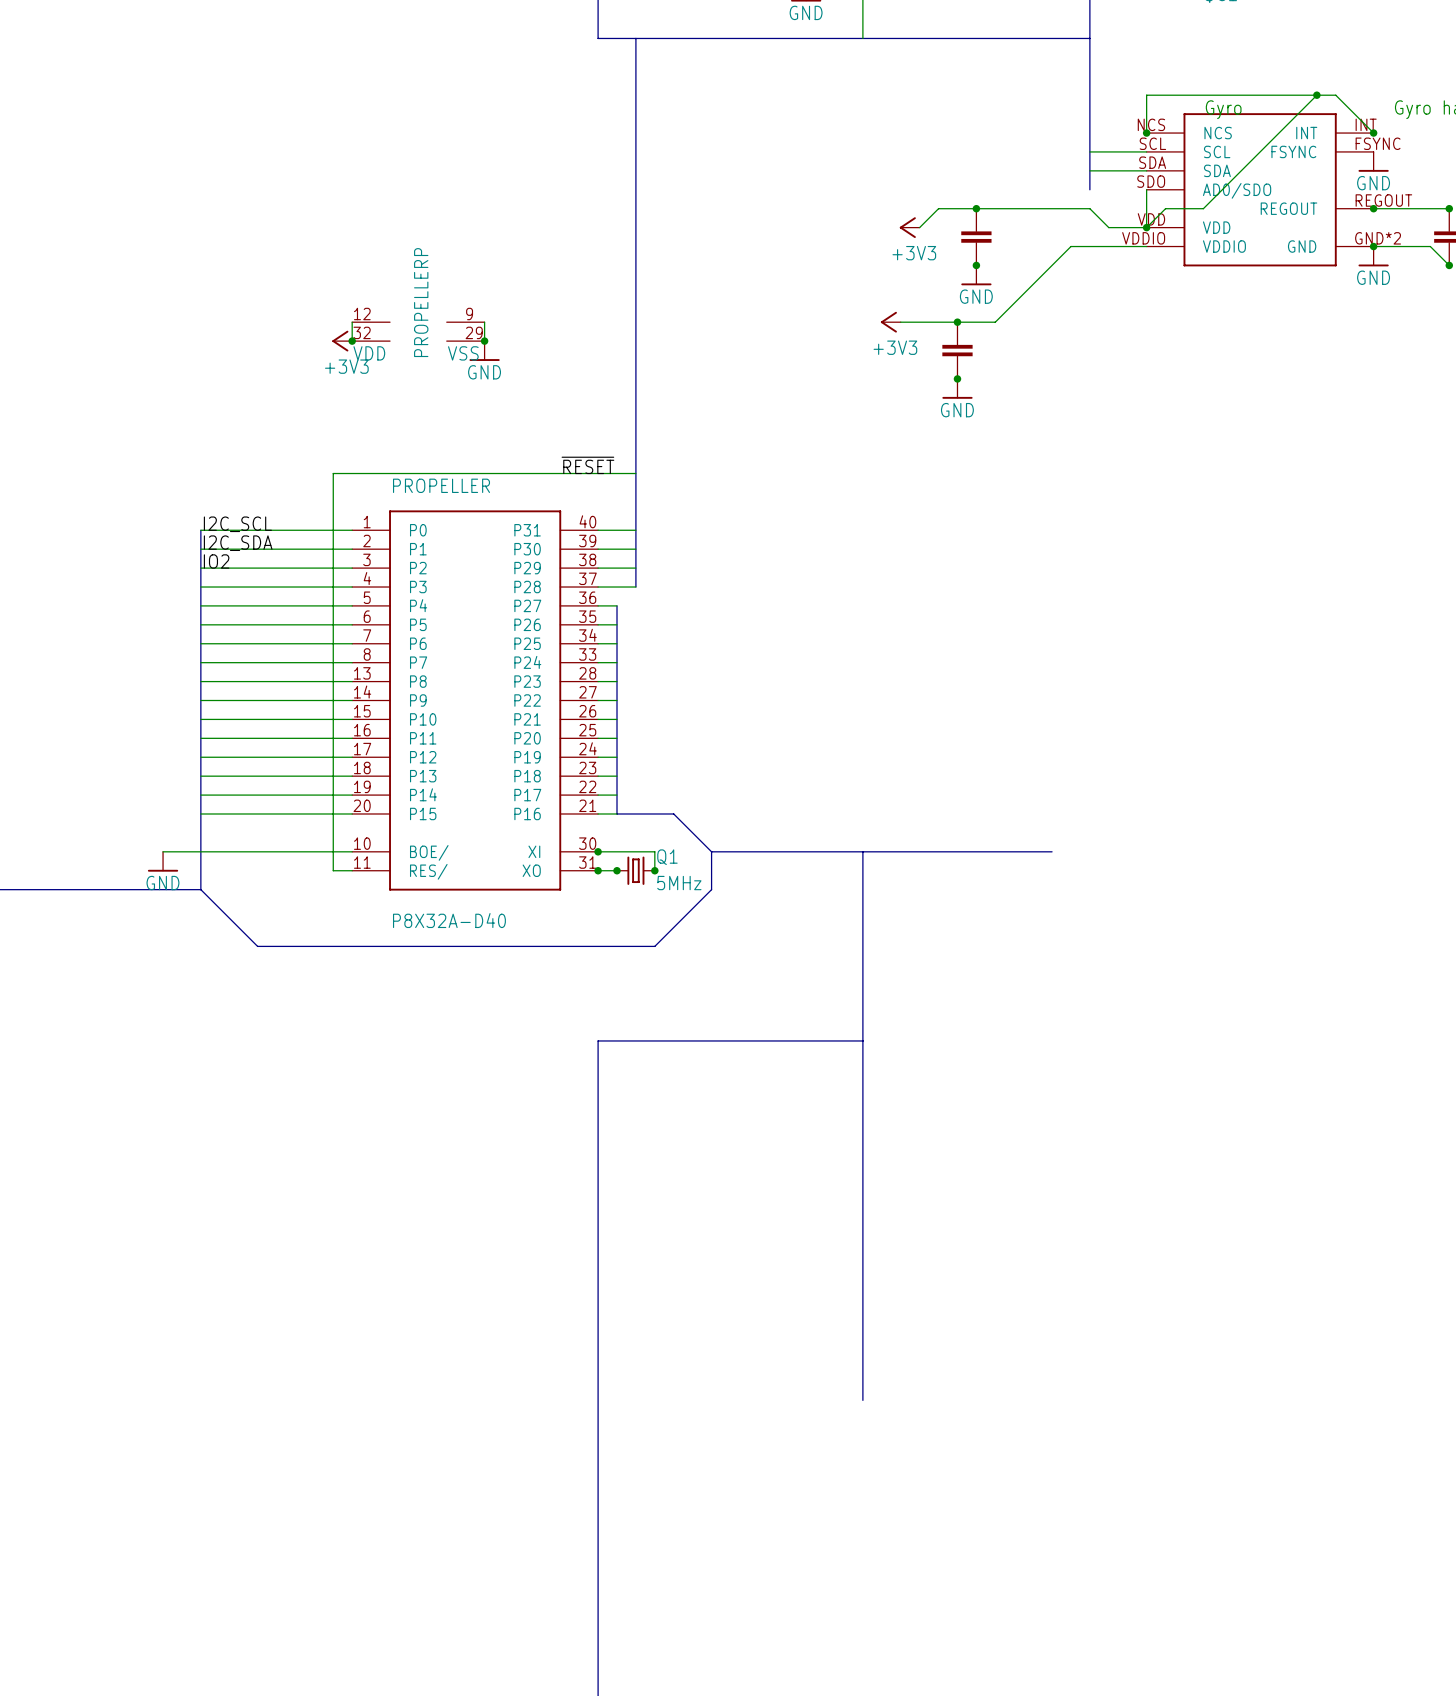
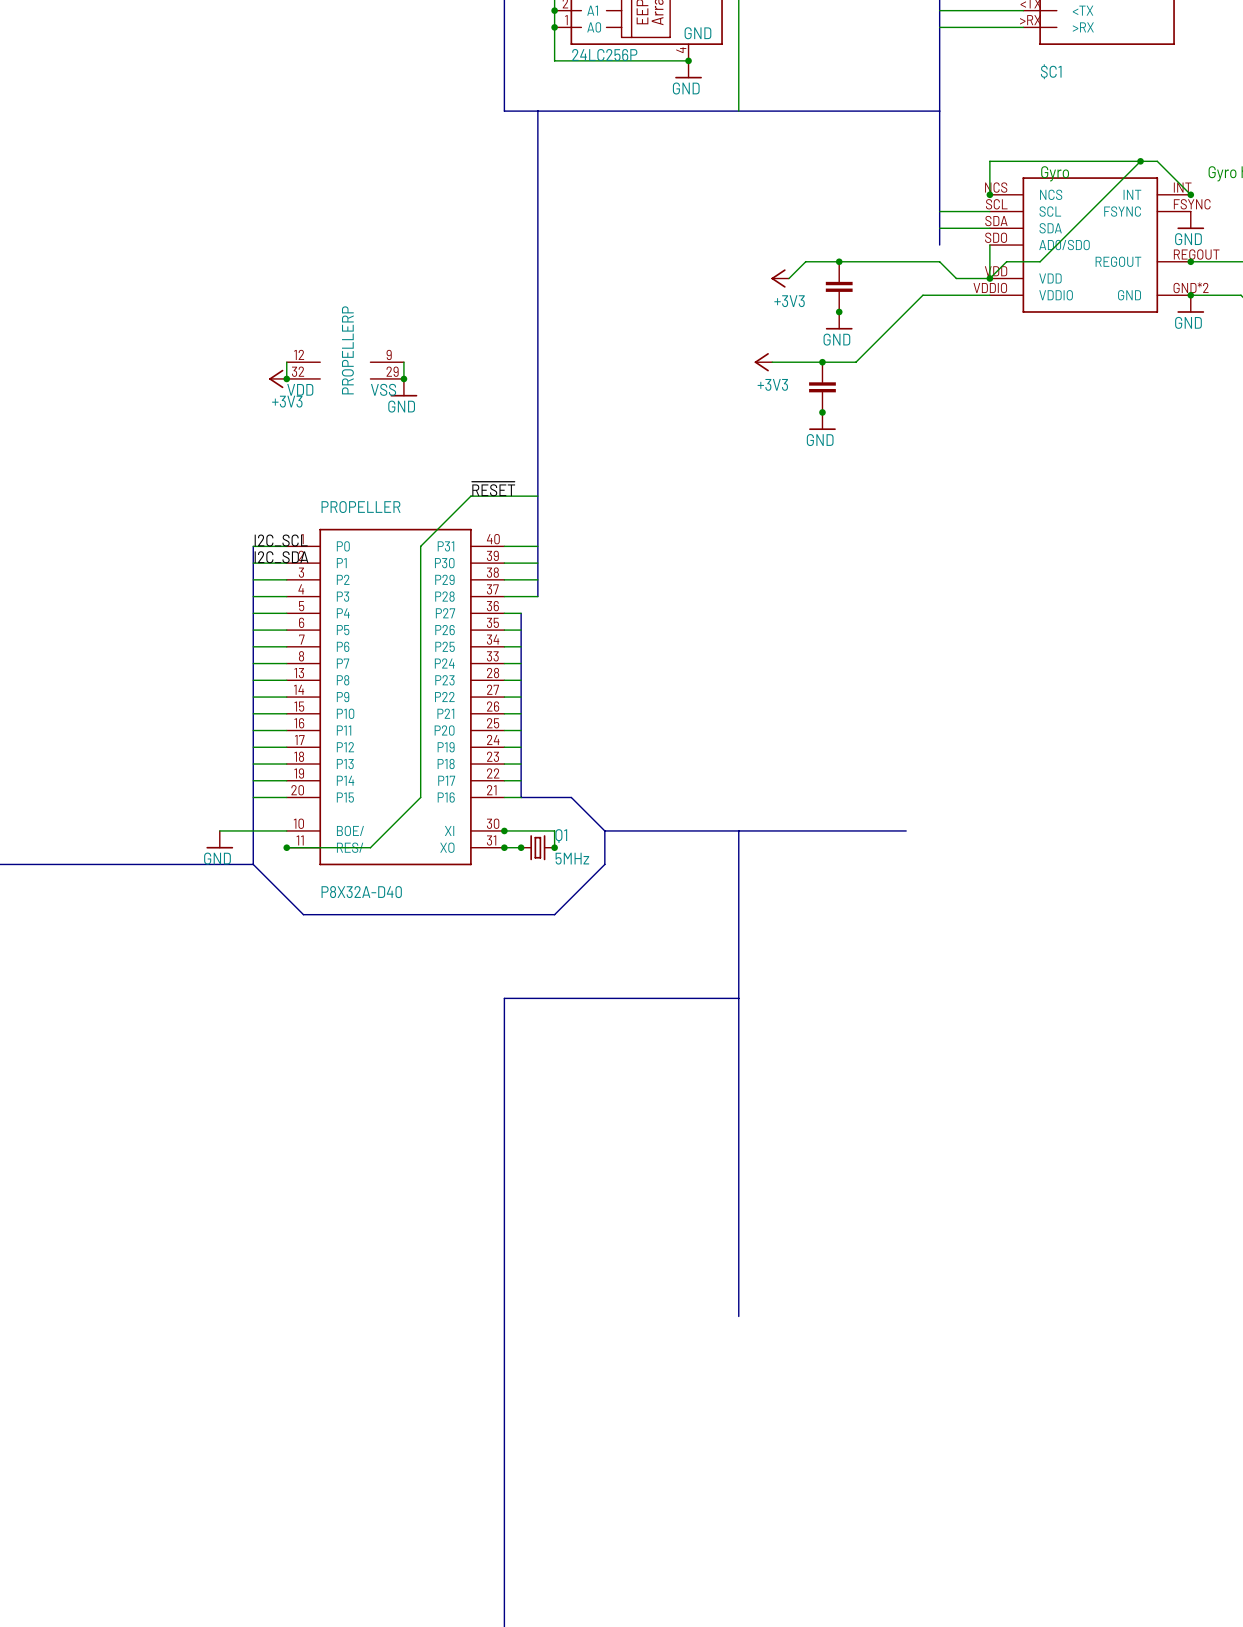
wire: (560, 473) (333, 473) (333, 870) (352, 870) -> (470, 496) (420, 546) (420, 797) (370, 847) (286, 847)
label position: I2C_SCL (237, 524) -> I2C_SCL (281, 540)
bus: (200, 530) (200, 889) (257, 946) (371, 946) -> (253, 864) (303, 914)
wire: (200, 530) (314, 530) -> none
bus: none -> (253, 546) (253, 864)
label position: I2C_SDA (238, 543) -> I2C_SDA (281, 557)
wire: (200, 549) (314, 549) -> none
label: IO2 (216, 561) -> none
wire: (200, 568) (314, 568) -> none
wire: (200, 587) (314, 587) -> none
wire: (200, 605) (314, 605) -> none
wire: (200, 624) (314, 624) -> none
wire: (200, 643) (314, 643) -> none
wire: (200, 662) (314, 662) -> none
wire: (200, 681) (314, 681) -> none
wire: (200, 700) (314, 700) -> none
wire: (200, 719) (314, 719) -> none
wire: (200, 738) (314, 738) -> none
wire: (200, 757) (314, 757) -> none
wire: (200, 776) (314, 776) -> none
wire: (200, 795) (314, 795) -> none
wire: (200, 813) (314, 813) -> none
wire: (163, 851) (276, 851) -> none
power symbol position: GND (163, 861) -> GND (219, 839)
junction: none -> (286, 847)
bus: none -> (152, 864) (253, 864)

